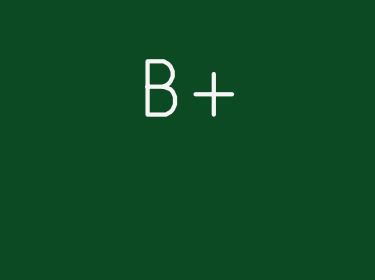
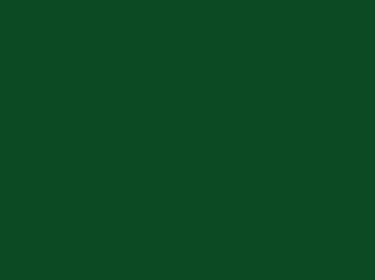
text: B+ (189, 87) -> none

